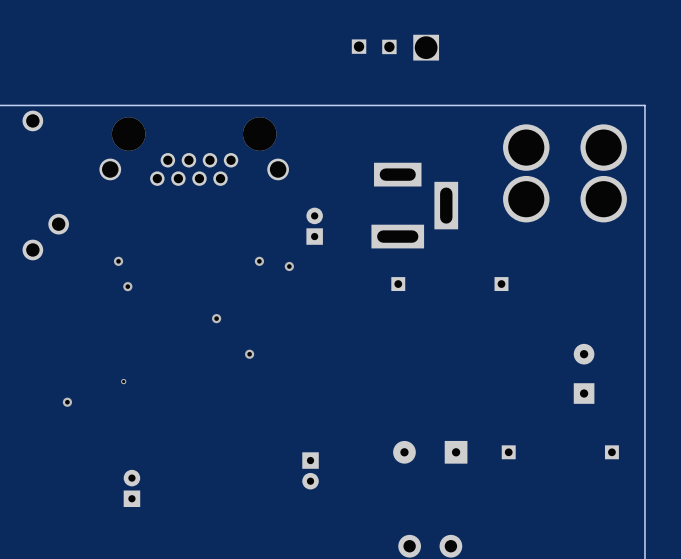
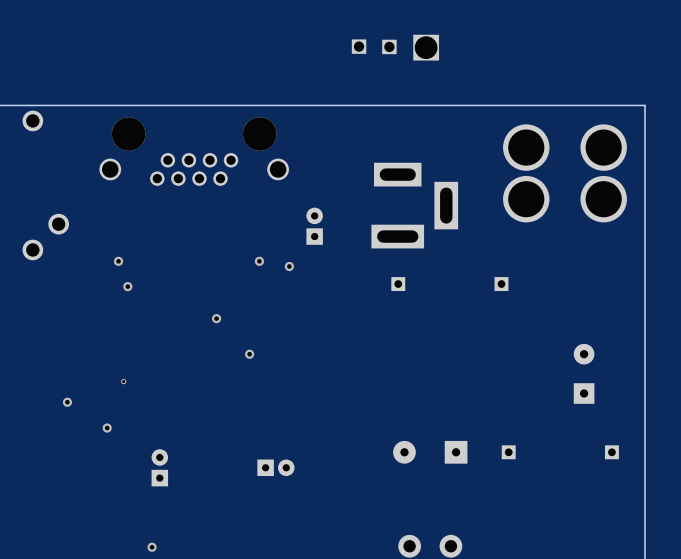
via: none -> (107, 428)
part rotation: 0° (310, 470) -> 90° counterclockwise (275, 467)
part position: (310, 470) -> (275, 467)
part position: (131, 488) -> (159, 467)
via: none -> (152, 547)

